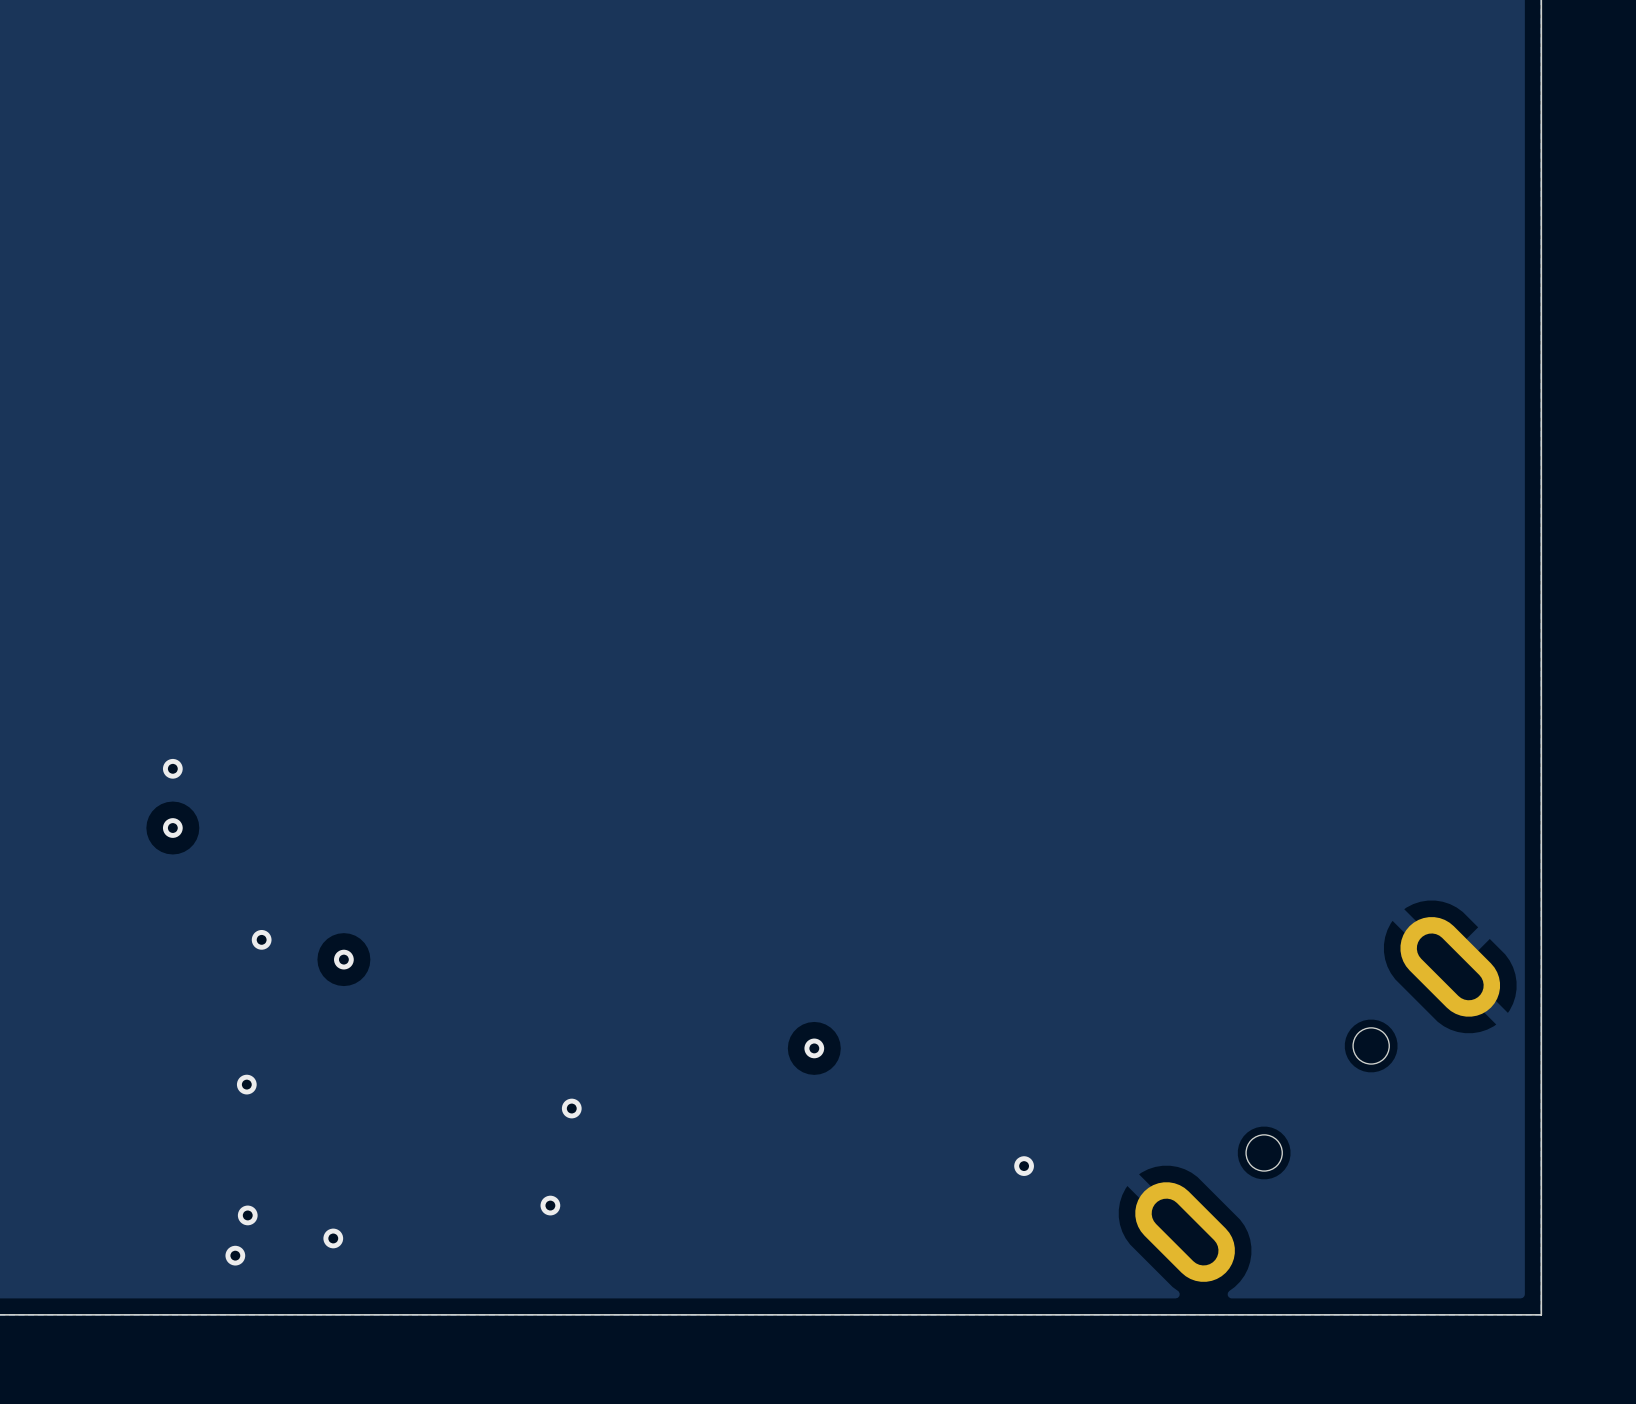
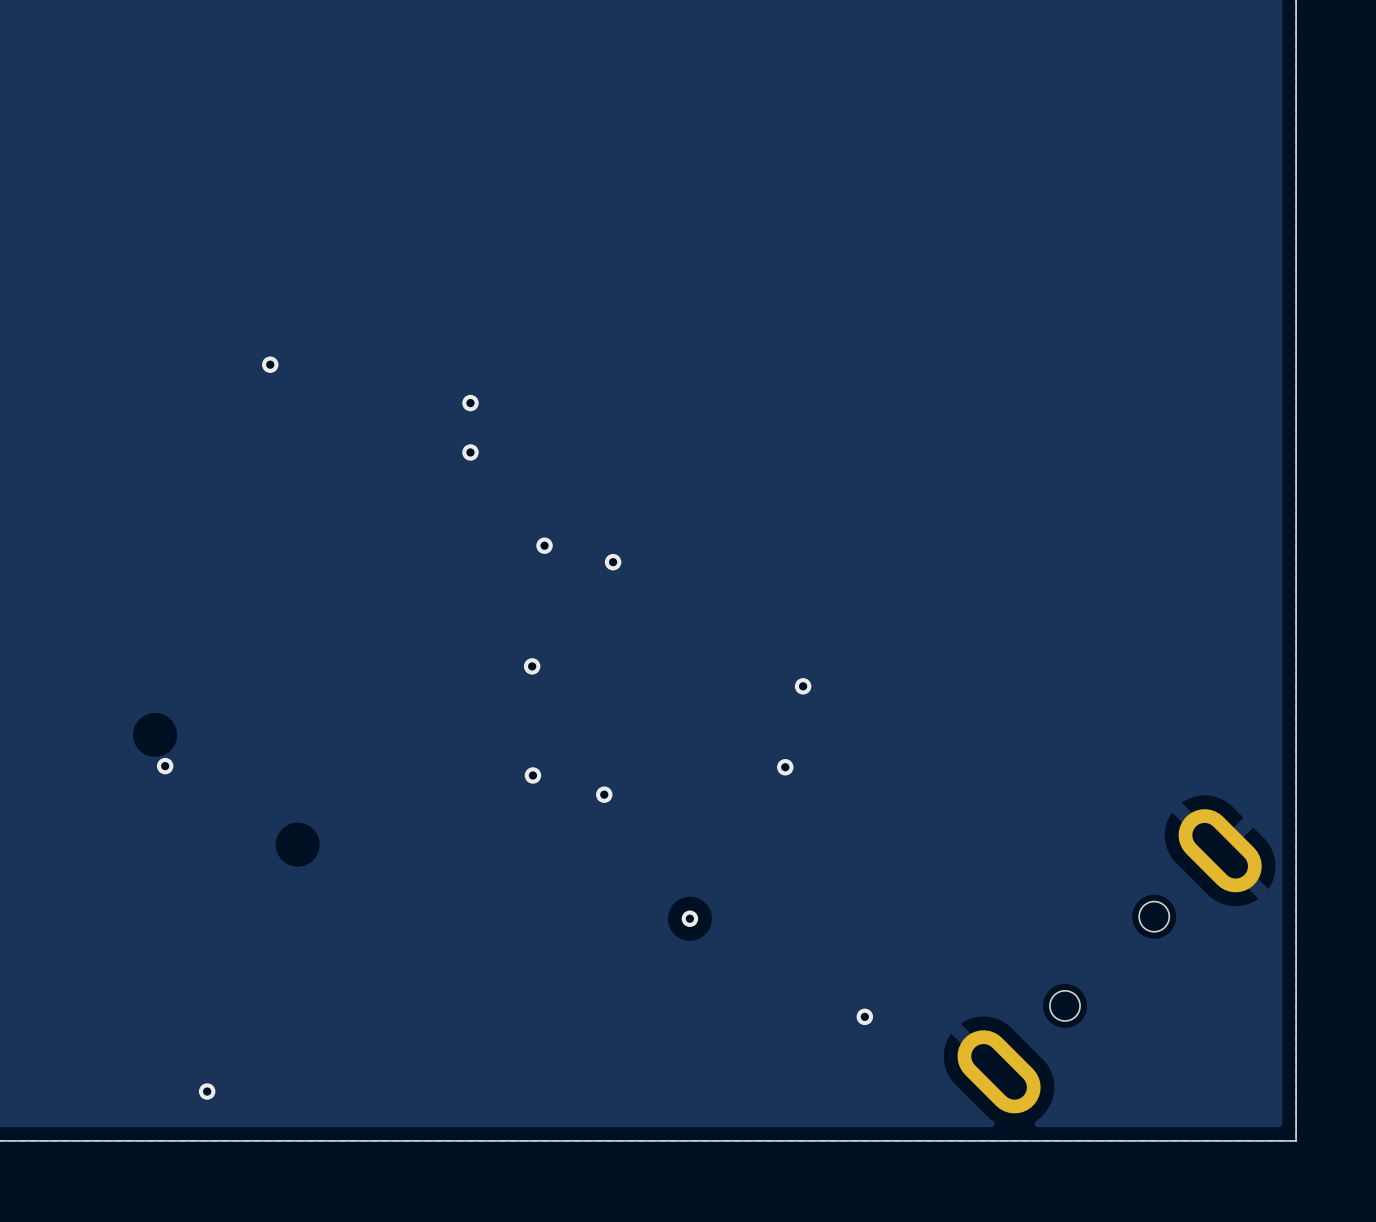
via: none -> (270, 364)
via: none -> (470, 403)
via: none -> (470, 452)
via: none -> (544, 545)
via: none -> (613, 562)
via: none -> (532, 666)
via: (172, 768) -> none
via: none -> (803, 686)
via position: (172, 828) -> (165, 766)
via: none -> (785, 767)
via: none -> (532, 775)
via: none -> (604, 794)
via: (261, 939) -> none
via: (343, 959) -> none
via: (246, 1084) -> none
via: (571, 1108) -> none
via: (550, 1205) -> none
via: (247, 1215) -> none
via: (333, 1238) -> none

